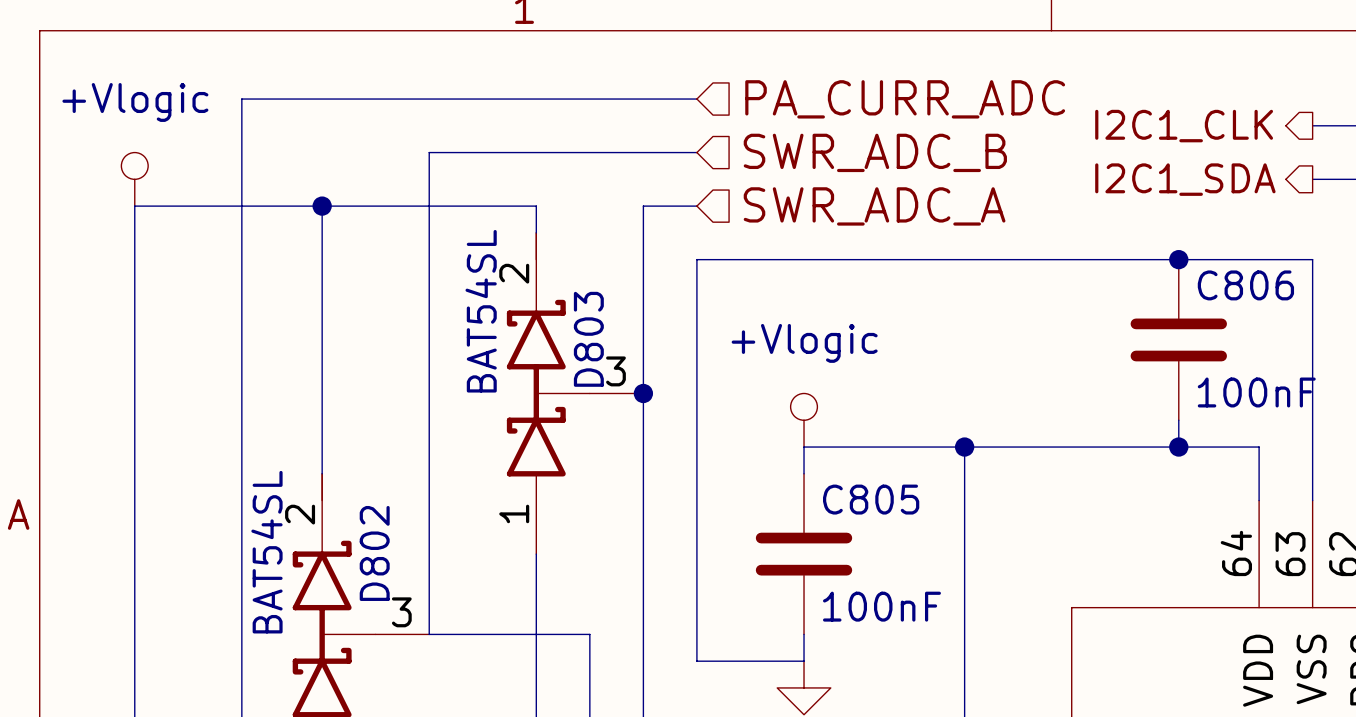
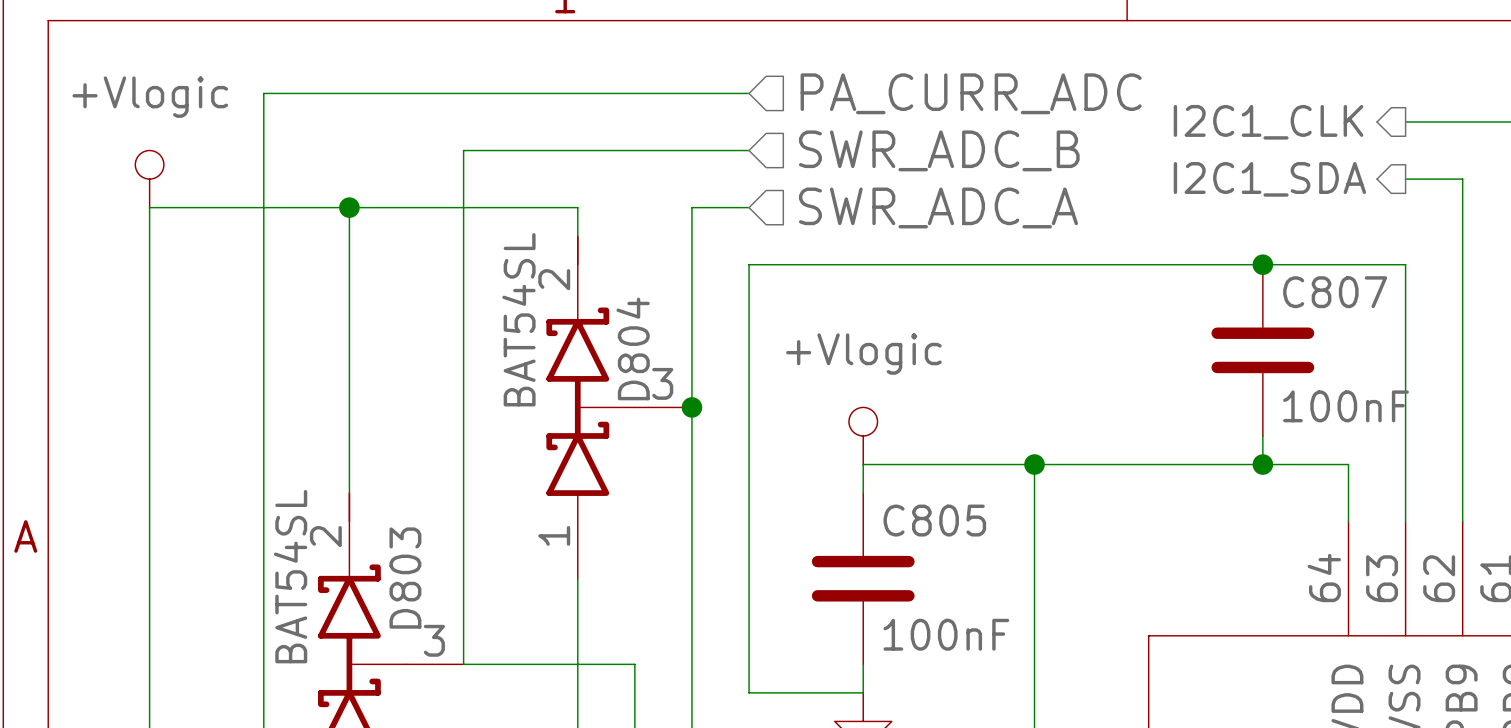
C806 name: C806 (1245, 285) -> C807 (1335, 292)
D803 name: D803 (588, 339) -> D804 (633, 348)
D802 name: D802 (374, 553) -> D803 (405, 578)

